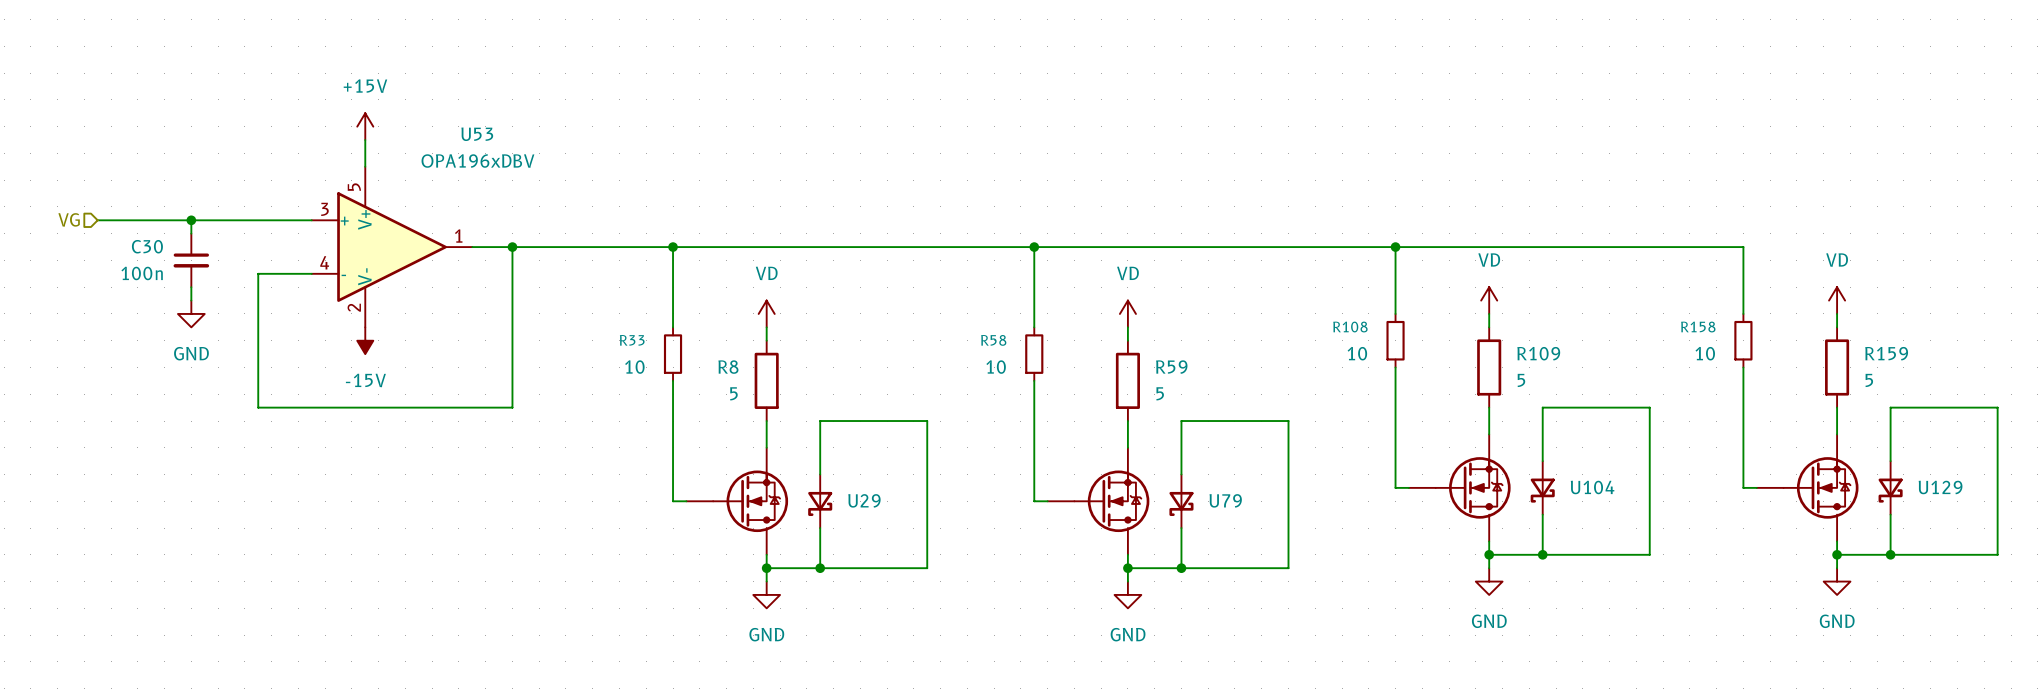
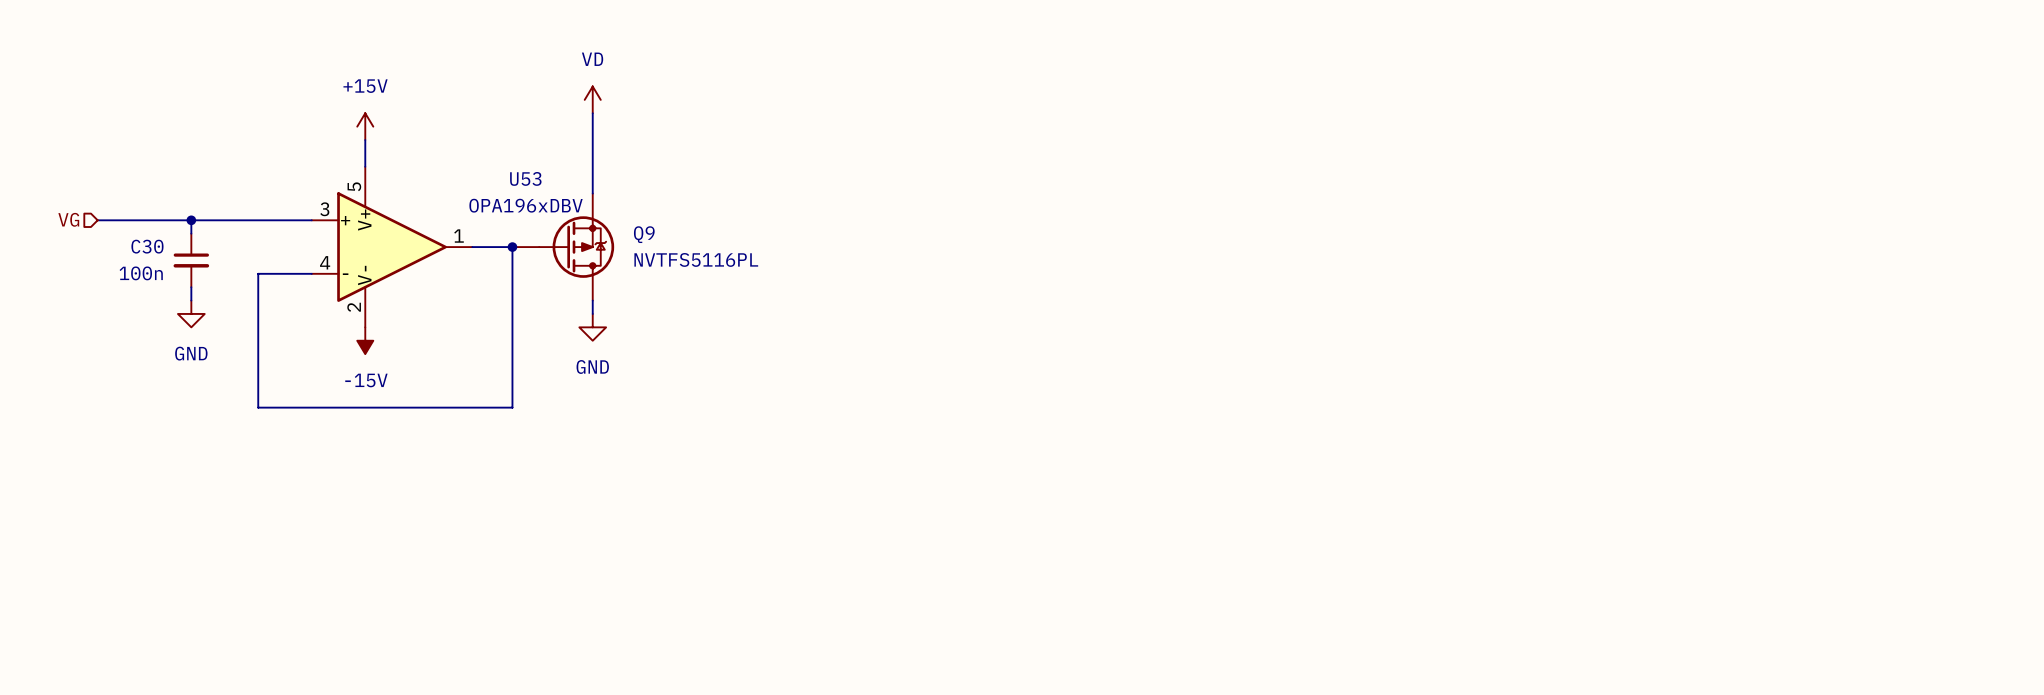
power symbol: none -> VD (592, 99)
U53 name position: U53 (477, 134) -> U53 (525, 178)
U53 value position: OPA196xDBV (477, 161) -> OPA196xDBV (526, 205)
wire: (512, 247) (1743, 247) (1743, 313) -> none
Q9: none -> NVTFS5116PL (563, 247)
wire: (673, 247) (673, 327) -> (592, 113) (592, 193)
junction: (673, 247) -> none
wire: (1034, 247) (1034, 327) -> none
junction: (1034, 247) -> none
wire: (1395, 247) (1395, 313) -> none
junction: (1395, 247) -> none
power symbol: VD (1489, 300) -> none
power symbol: VD (1837, 300) -> none
power symbol: VD (766, 313) -> none
power symbol: VD (1127, 313) -> none
wire: (1489, 313) (1489, 327) -> none
wire: (1837, 313) (1837, 327) -> none
power symbol: none -> GND (592, 327)
wire: (766, 327) (766, 340) -> (592, 300) (592, 313)
wire: (1127, 327) (1127, 340) -> none
R108: 10 (1395, 340) -> none
R158: 10 (1743, 340) -> none
R33: 10 (673, 354) -> none
R58: 10 (1034, 354) -> none
wire: (1395, 367) (1395, 487) (1408, 487) -> none
R109: 5 (1489, 367) -> none
wire: (1743, 367) (1743, 487) (1756, 487) -> none
R159: 5 (1837, 367) -> none
wire: (673, 380) (673, 501) (686, 501) -> none
R8: 5 (766, 380) -> none
wire: (1034, 380) (1034, 501) (1047, 501) -> none
R59: 5 (1127, 380) -> none
wire: (1489, 407) (1489, 434) -> none
wire: (1837, 407) (1837, 434) -> none
wire: (766, 421) (766, 447) -> none
wire: (1127, 421) (1127, 447) -> none
wire: (1542, 461) (1542, 407) (1649, 407) (1649, 554) (1489, 554) -> none
wire: (1890, 461) (1890, 407) (1997, 407) (1997, 554) (1837, 554) -> none
wire: (820, 474) (820, 421) (927, 421) (927, 568) (766, 568) -> none
wire: (1181, 474) (1181, 421) (1288, 421) (1288, 568) (1127, 568) -> none
U104: (1481, 487) -> none
U129: (1829, 487) -> none
U29: (759, 501) -> none
U79: (1120, 501) -> none
wire: (1542, 514) (1542, 554) -> none
wire: (1890, 514) (1890, 554) -> none
wire: (820, 528) (820, 568) -> none
wire: (1181, 528) (1181, 568) -> none
wire: (1489, 541) (1489, 568) -> none
wire: (1837, 541) (1837, 568) -> none
wire: (766, 554) (766, 581) -> none
wire: (1127, 554) (1127, 581) -> none
junction: (1489, 554) -> none
junction: (1542, 554) -> none
junction: (1837, 554) -> none
junction: (1890, 554) -> none
junction: (766, 568) -> none
junction: (820, 568) -> none
junction: (1127, 568) -> none
junction: (1181, 568) -> none
power symbol: GND (1489, 581) -> none
power symbol: GND (1837, 581) -> none
power symbol: GND (766, 594) -> none
power symbol: GND (1127, 594) -> none

